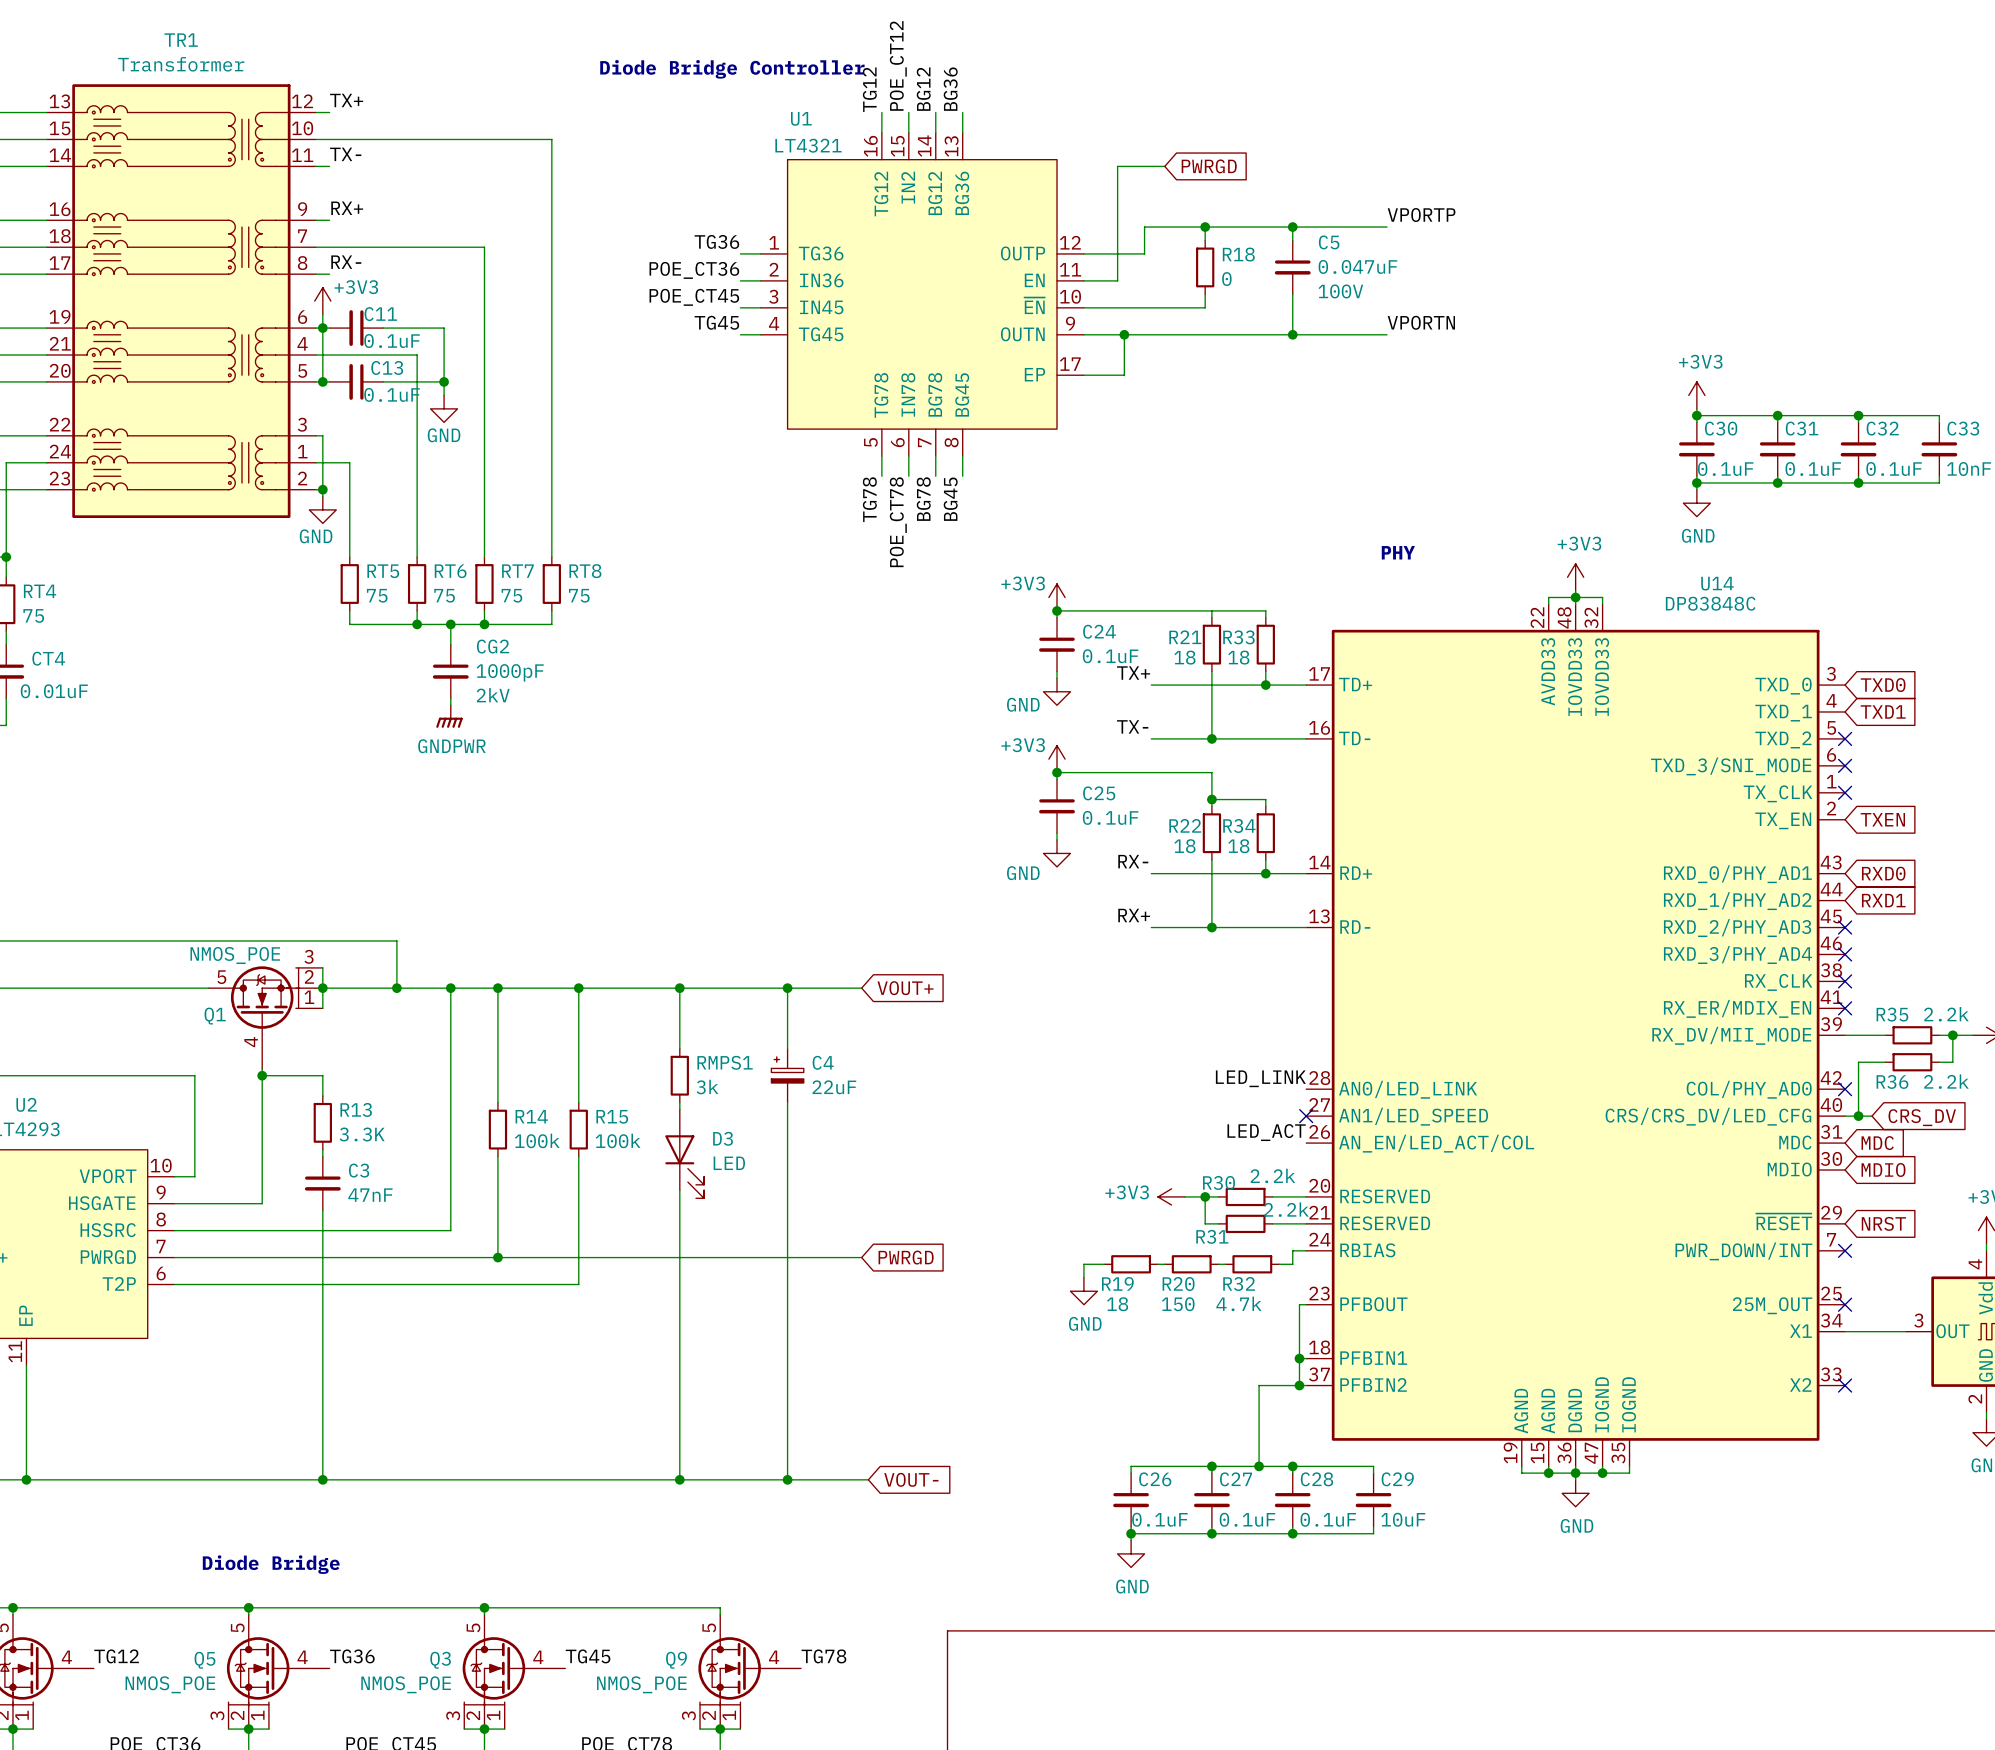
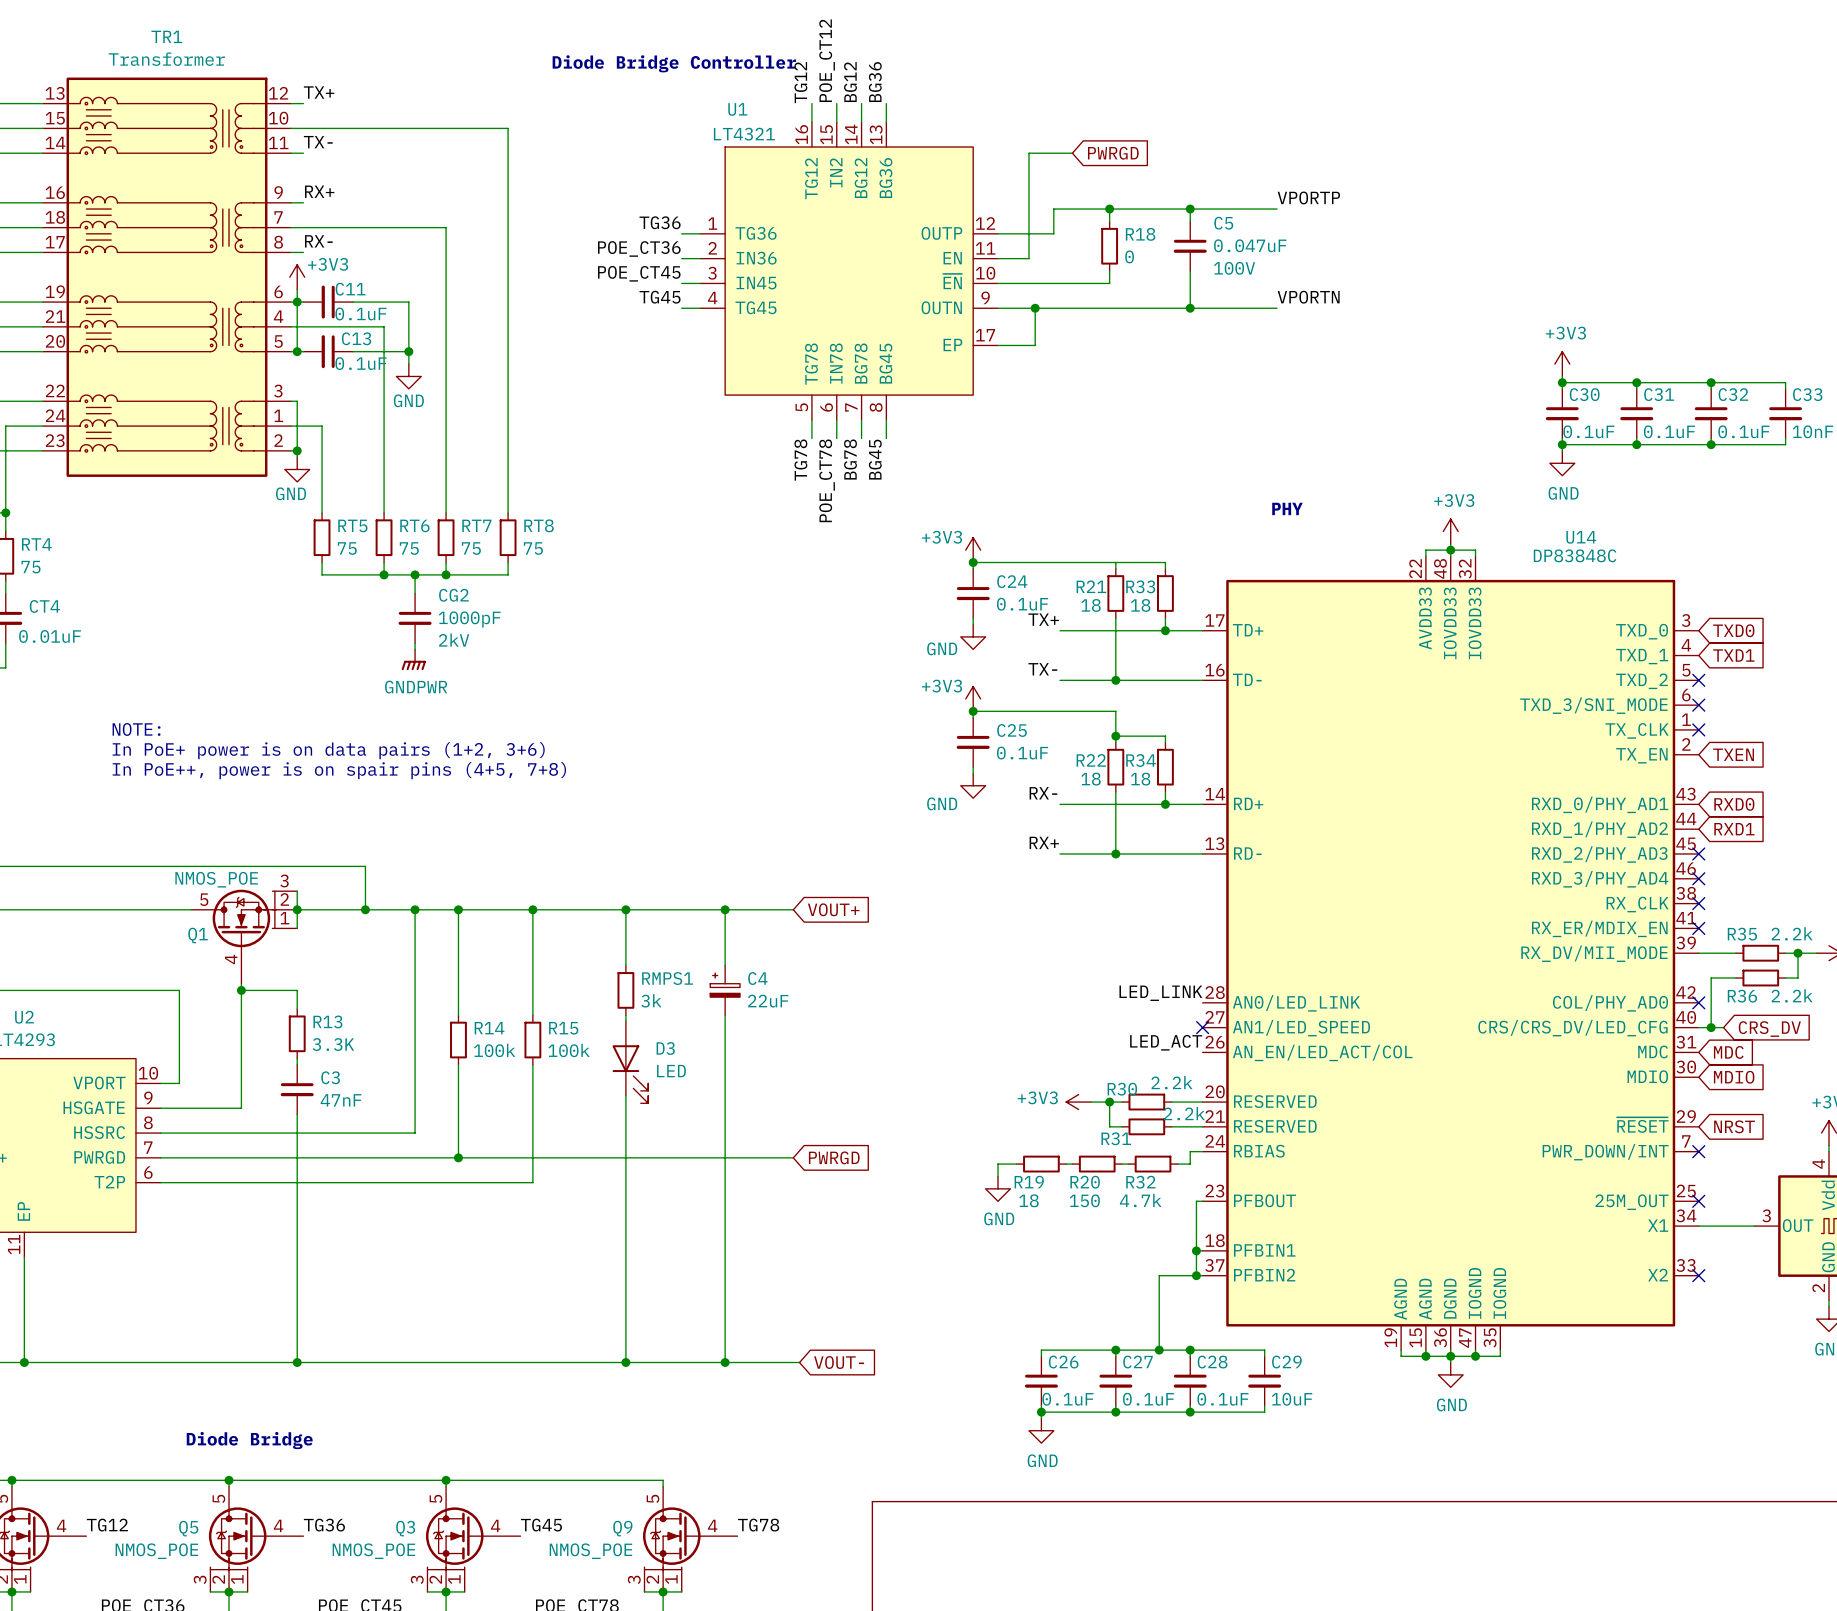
text: none -> NOTE: (136, 729)
text: none -> In PoE+ power is on data pairs (1+2, 3+6) (328, 750)
text: none -> In PoE++, power is on spair pins (4+5, 7+8) (339, 770)

